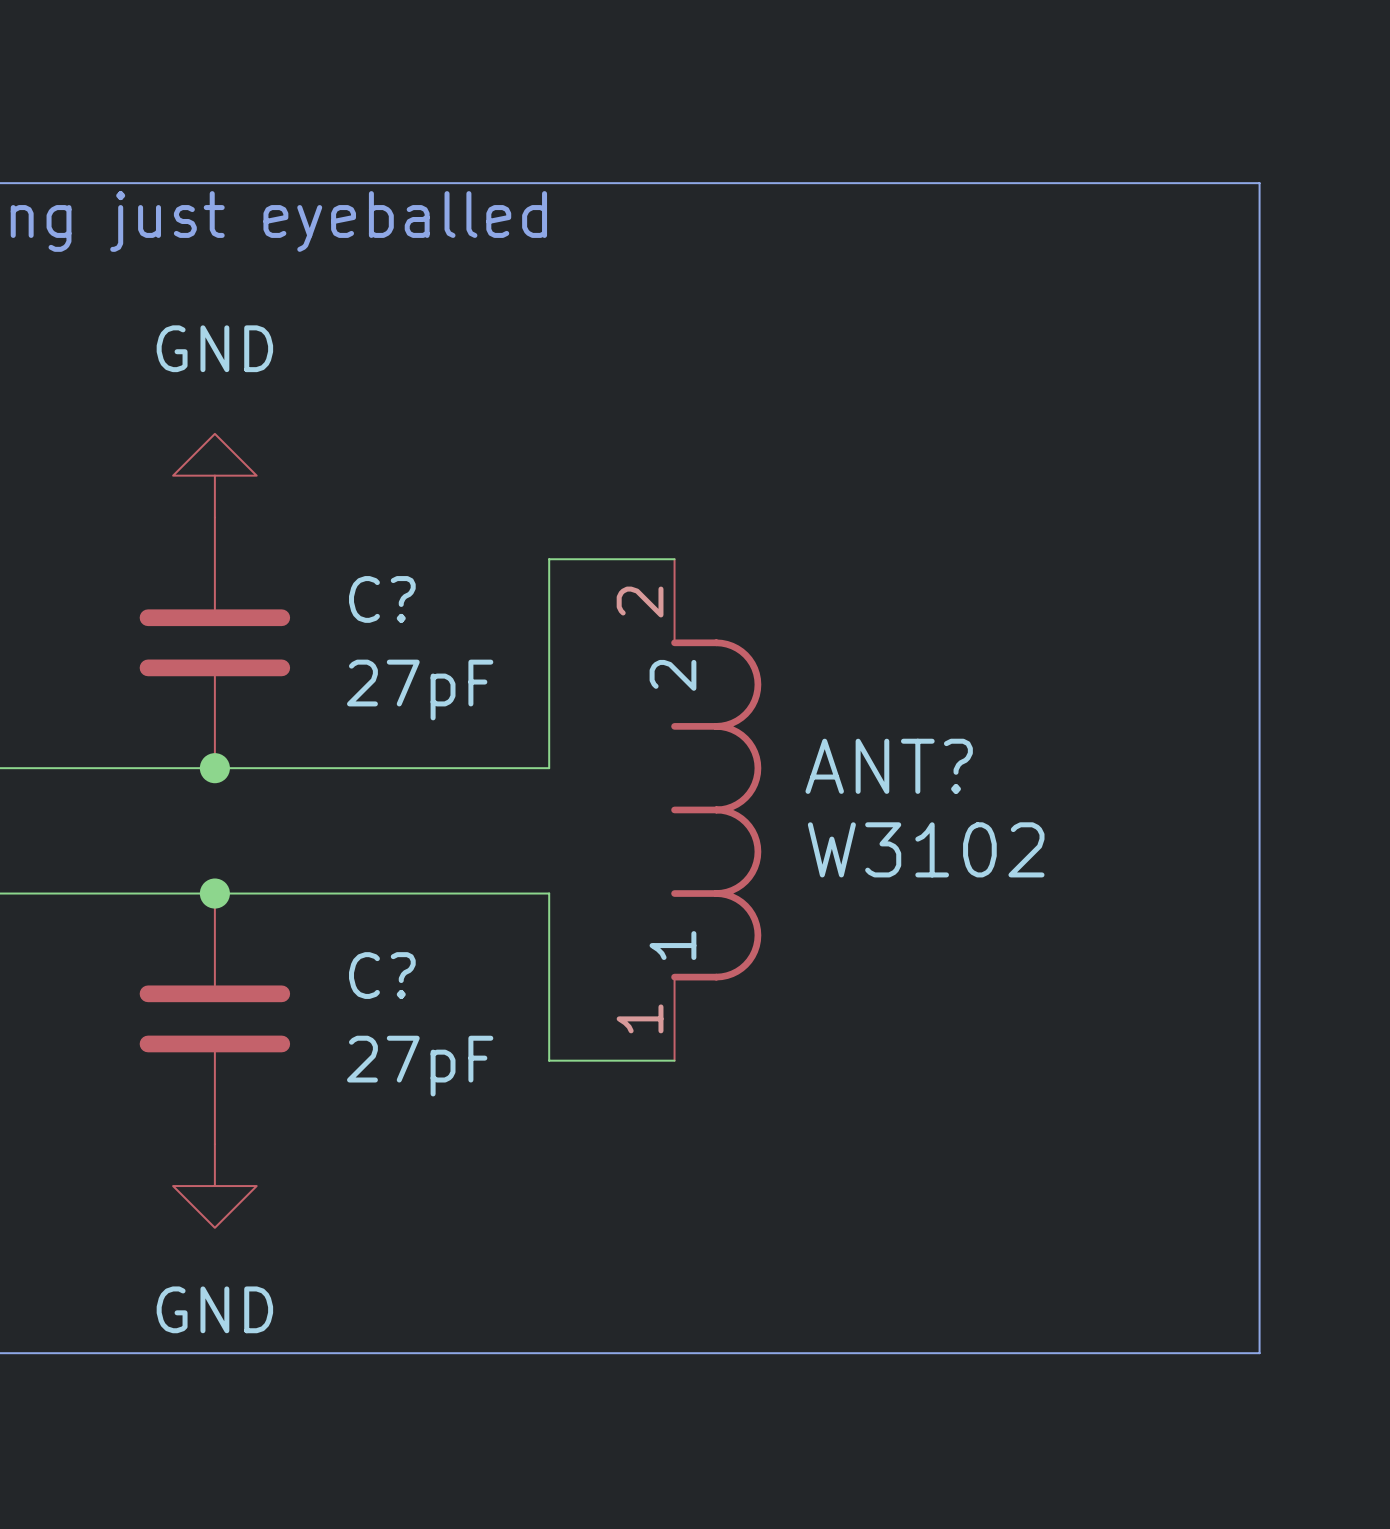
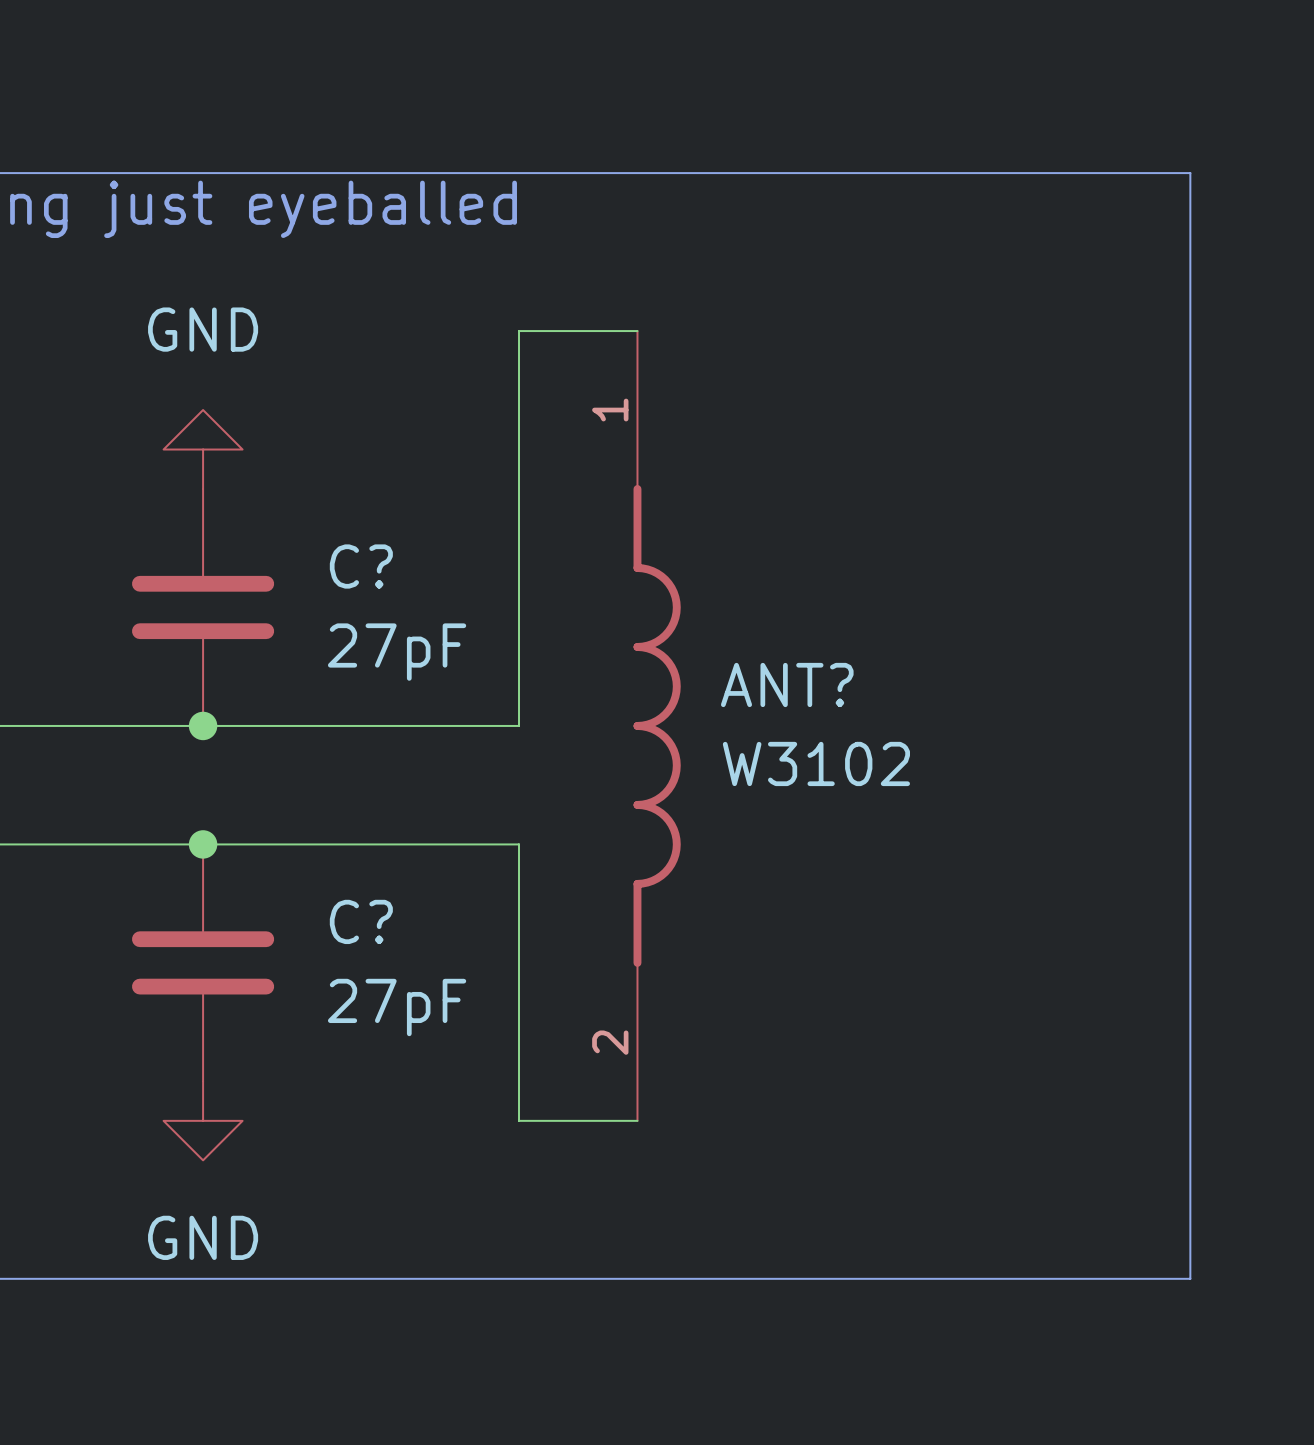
wire: (549, 559) (674, 559) -> (519, 528) (519, 331) (637, 331)
ANT?: none -> W3102 (657, 725)
ANT?: W3102 (716, 809) -> none
wire: (549, 1060) (674, 1060) -> (519, 1002) (519, 1120) (637, 1120)

